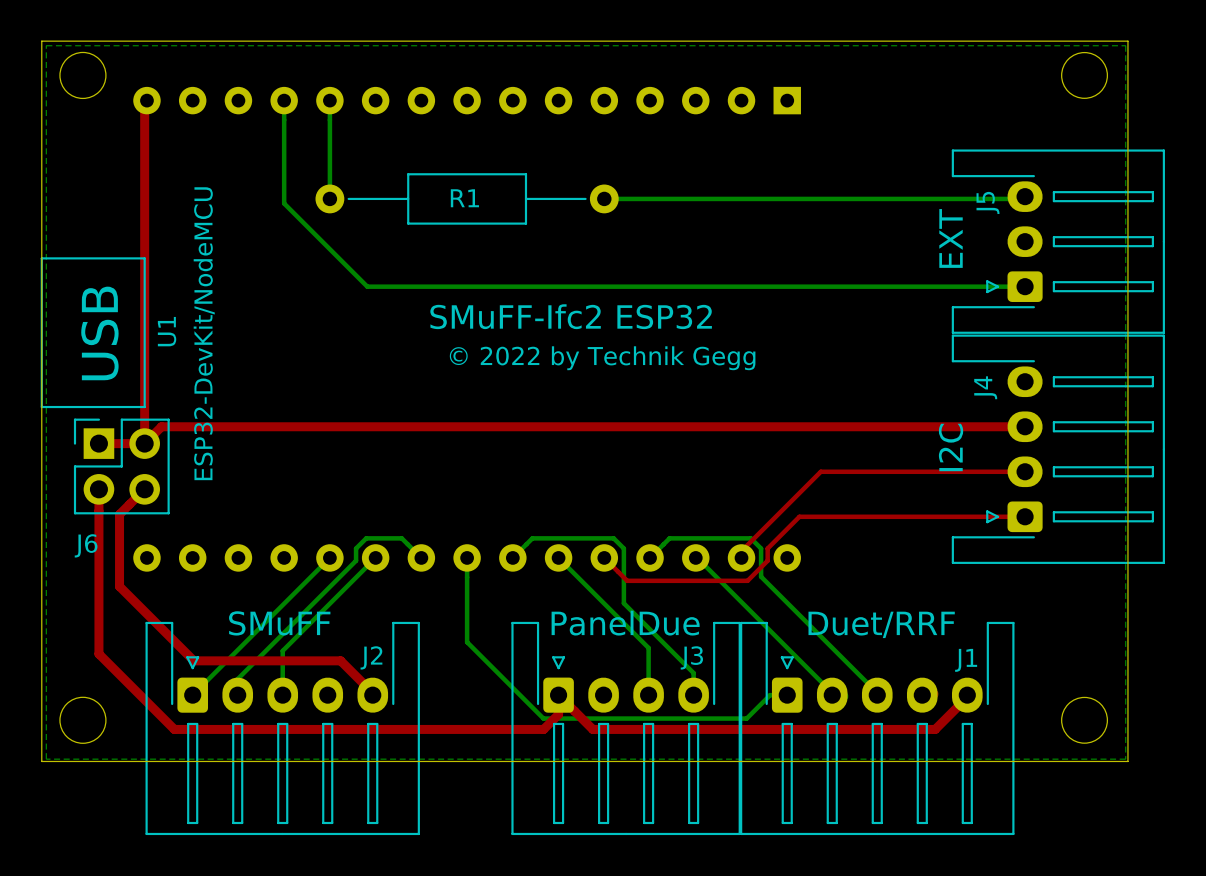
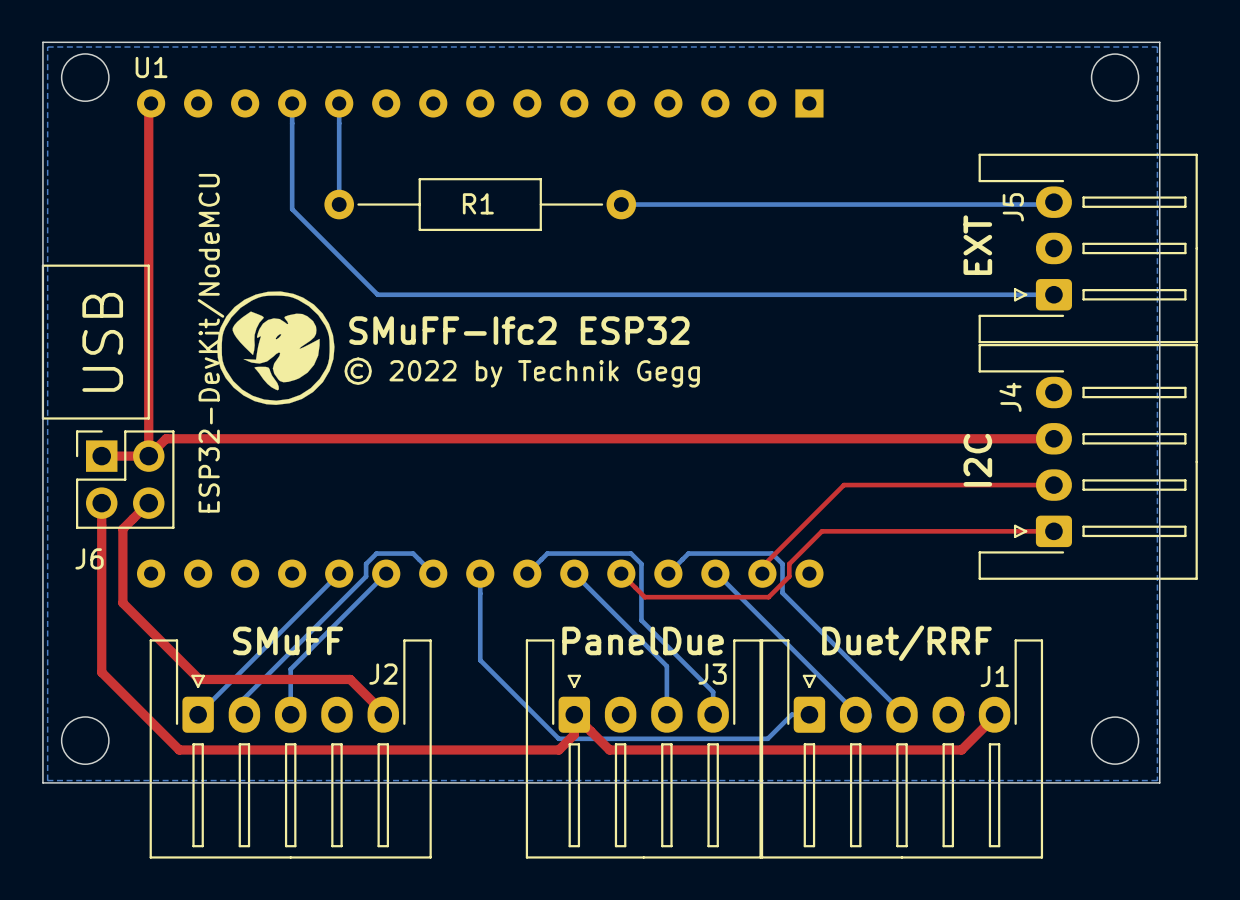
drawing: none -> [217, 291, 335, 405]
text position: SMuFF-Ifc2 ESP32 (571, 316) -> SMuFF-Ifc2 ESP32 (519, 330)
U1 name rotation: 0° (167, 331) -> 90° clockwise (151, 67)
U1 name position: U1 (167, 331) -> U1 (151, 67)
text position: © 2022 by Technik Gegg (602, 358) -> © 2022 by Technik Gegg (522, 372)

